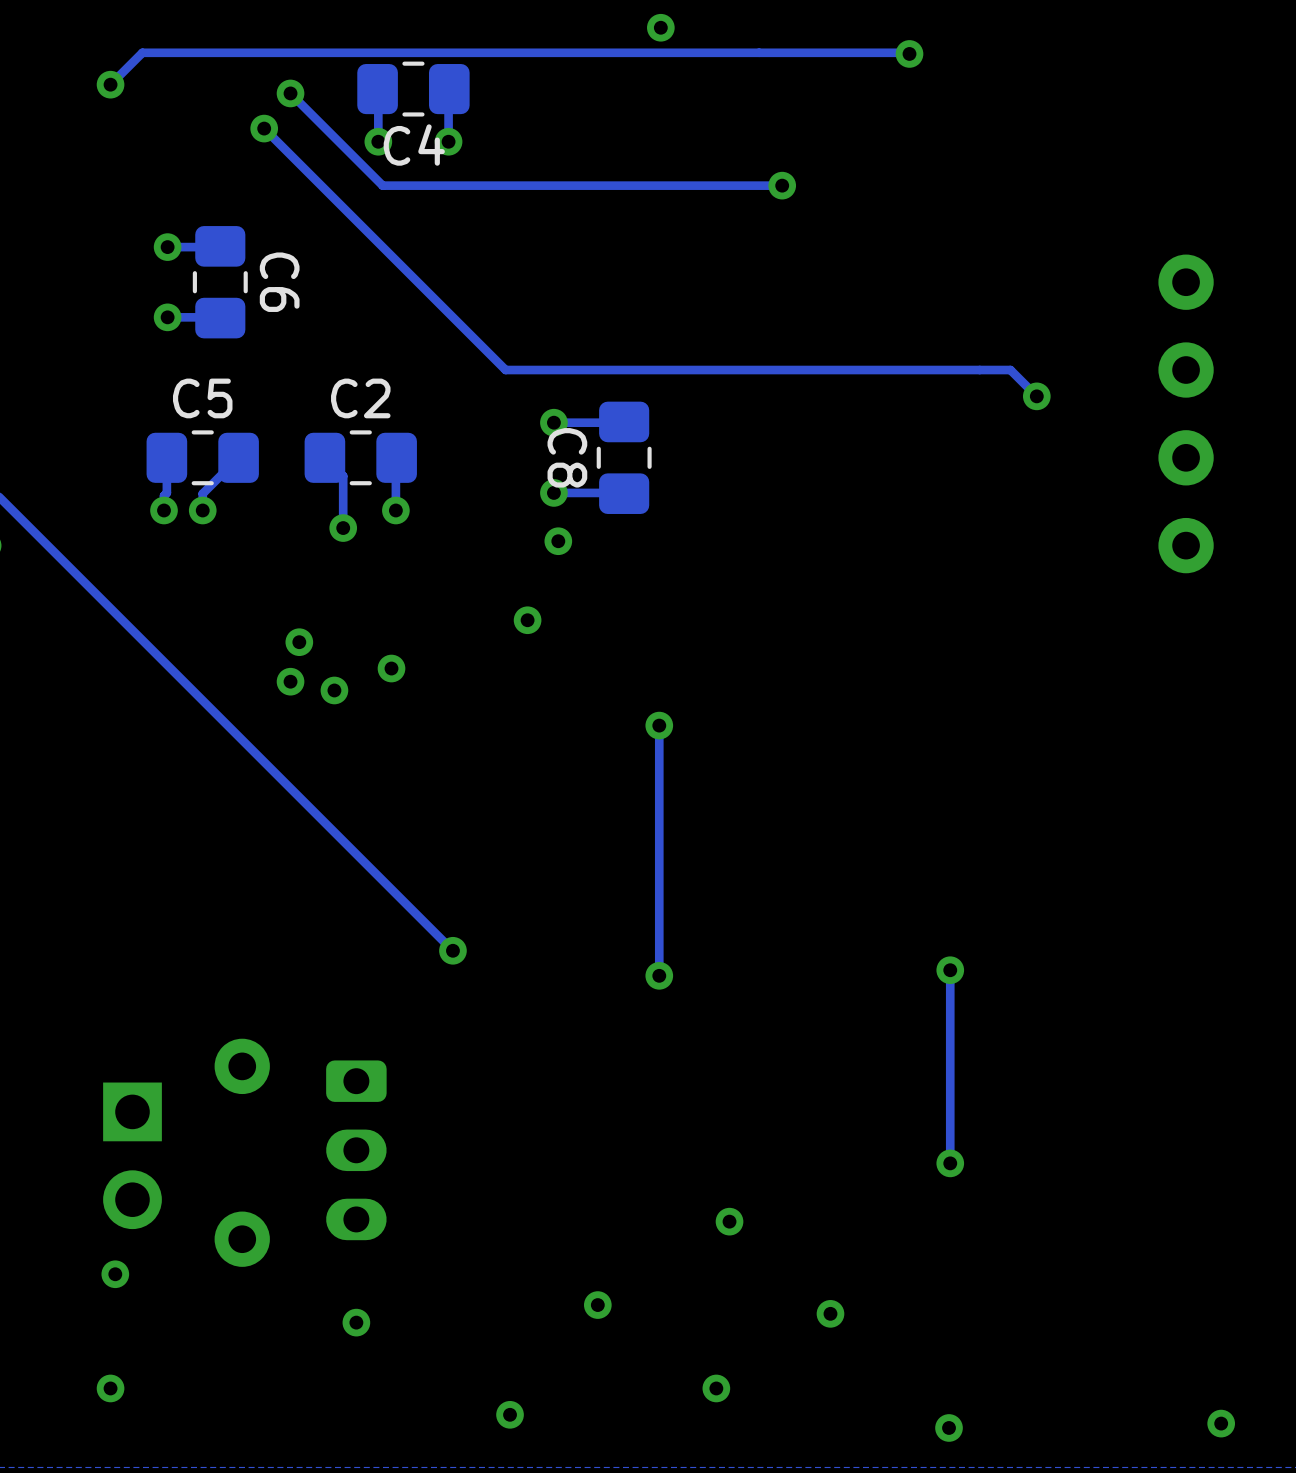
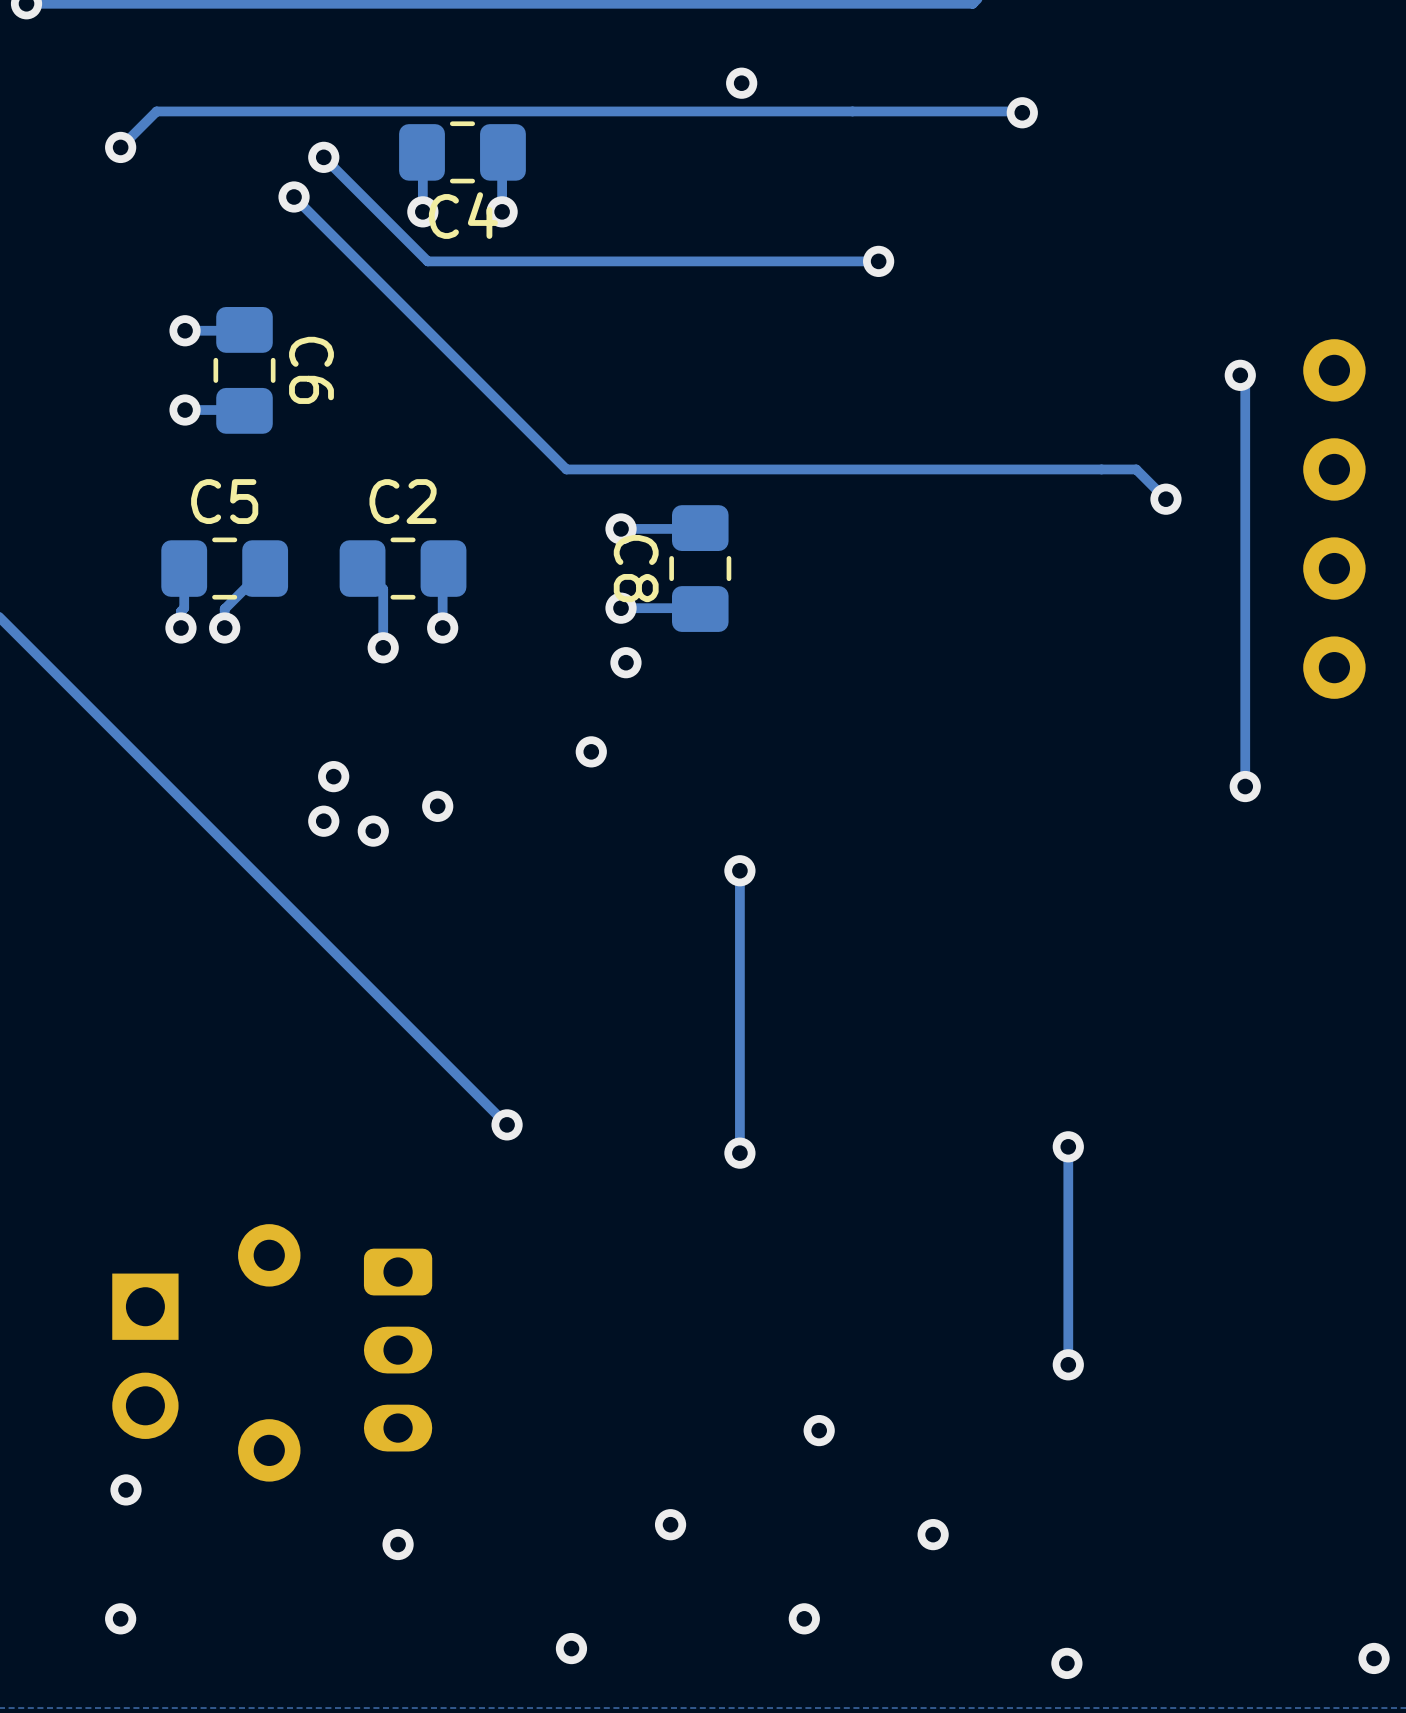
track: none -> (1240, 375) (1245, 380) (1245, 786)
via: none -> (1240, 375)
via: none -> (1245, 786)

